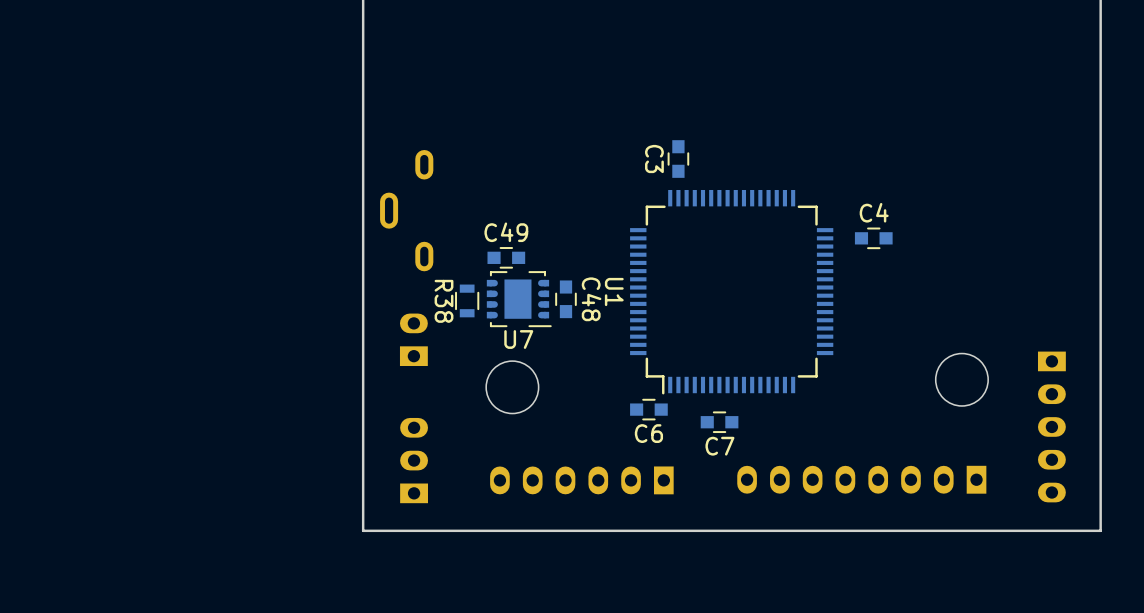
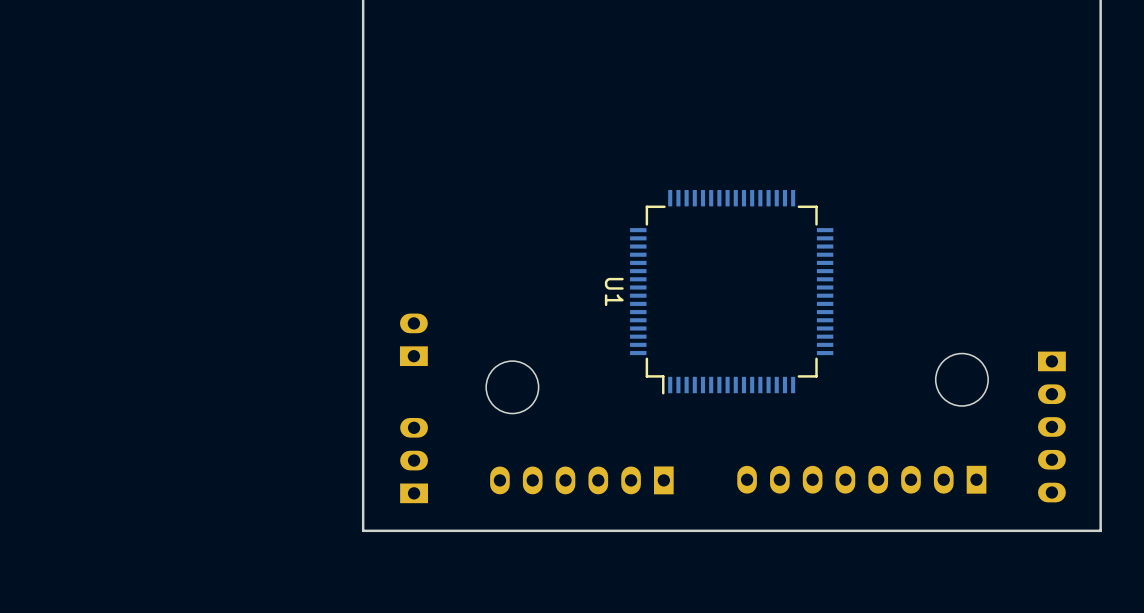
C3: (678, 159) -> none
part: (406, 210) -> none
C4: (873, 238) -> none
C49: (506, 257) -> none
U7: (519, 299) -> none
C48: (565, 299) -> none
R38: (467, 300) -> none
C6: (648, 409) -> none
C7: (719, 422) -> none

